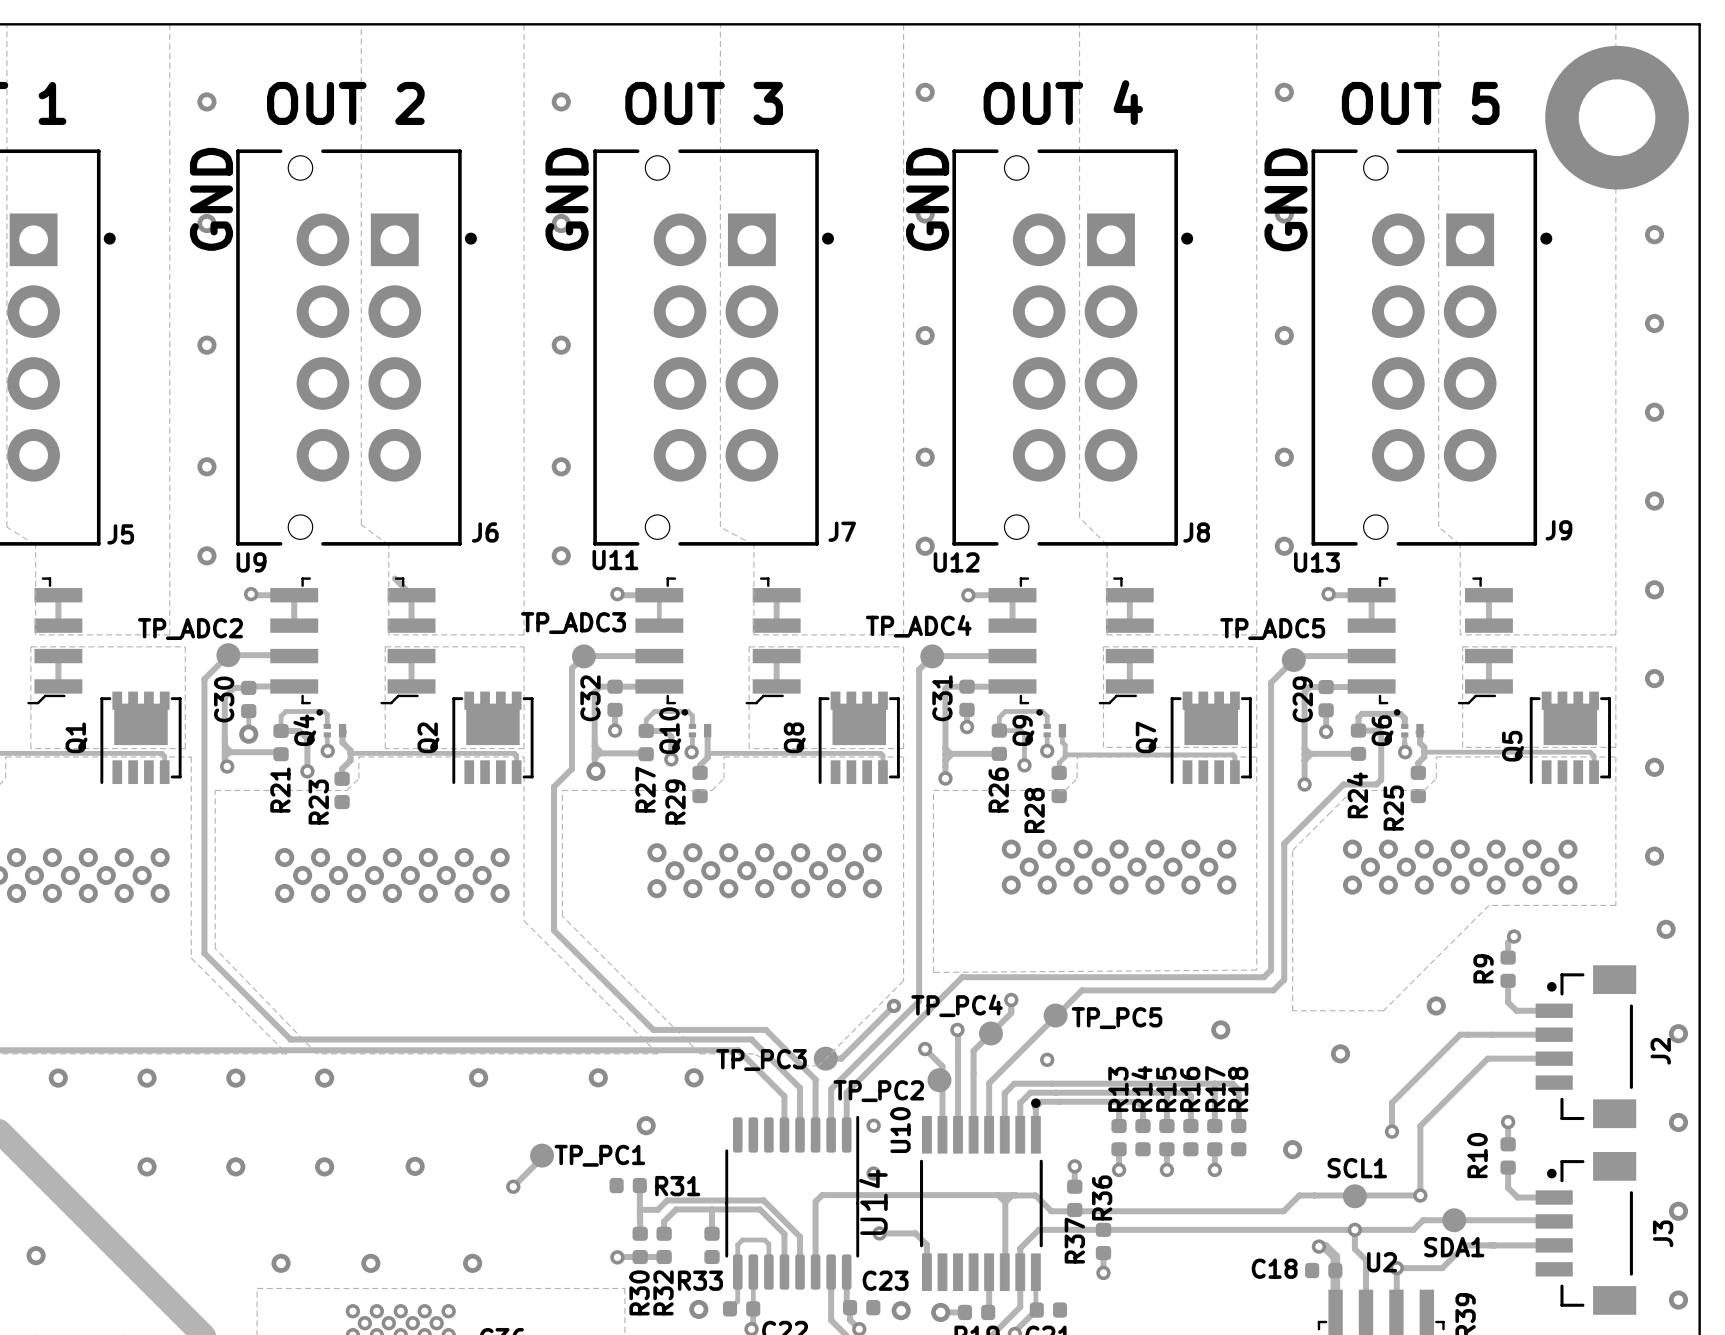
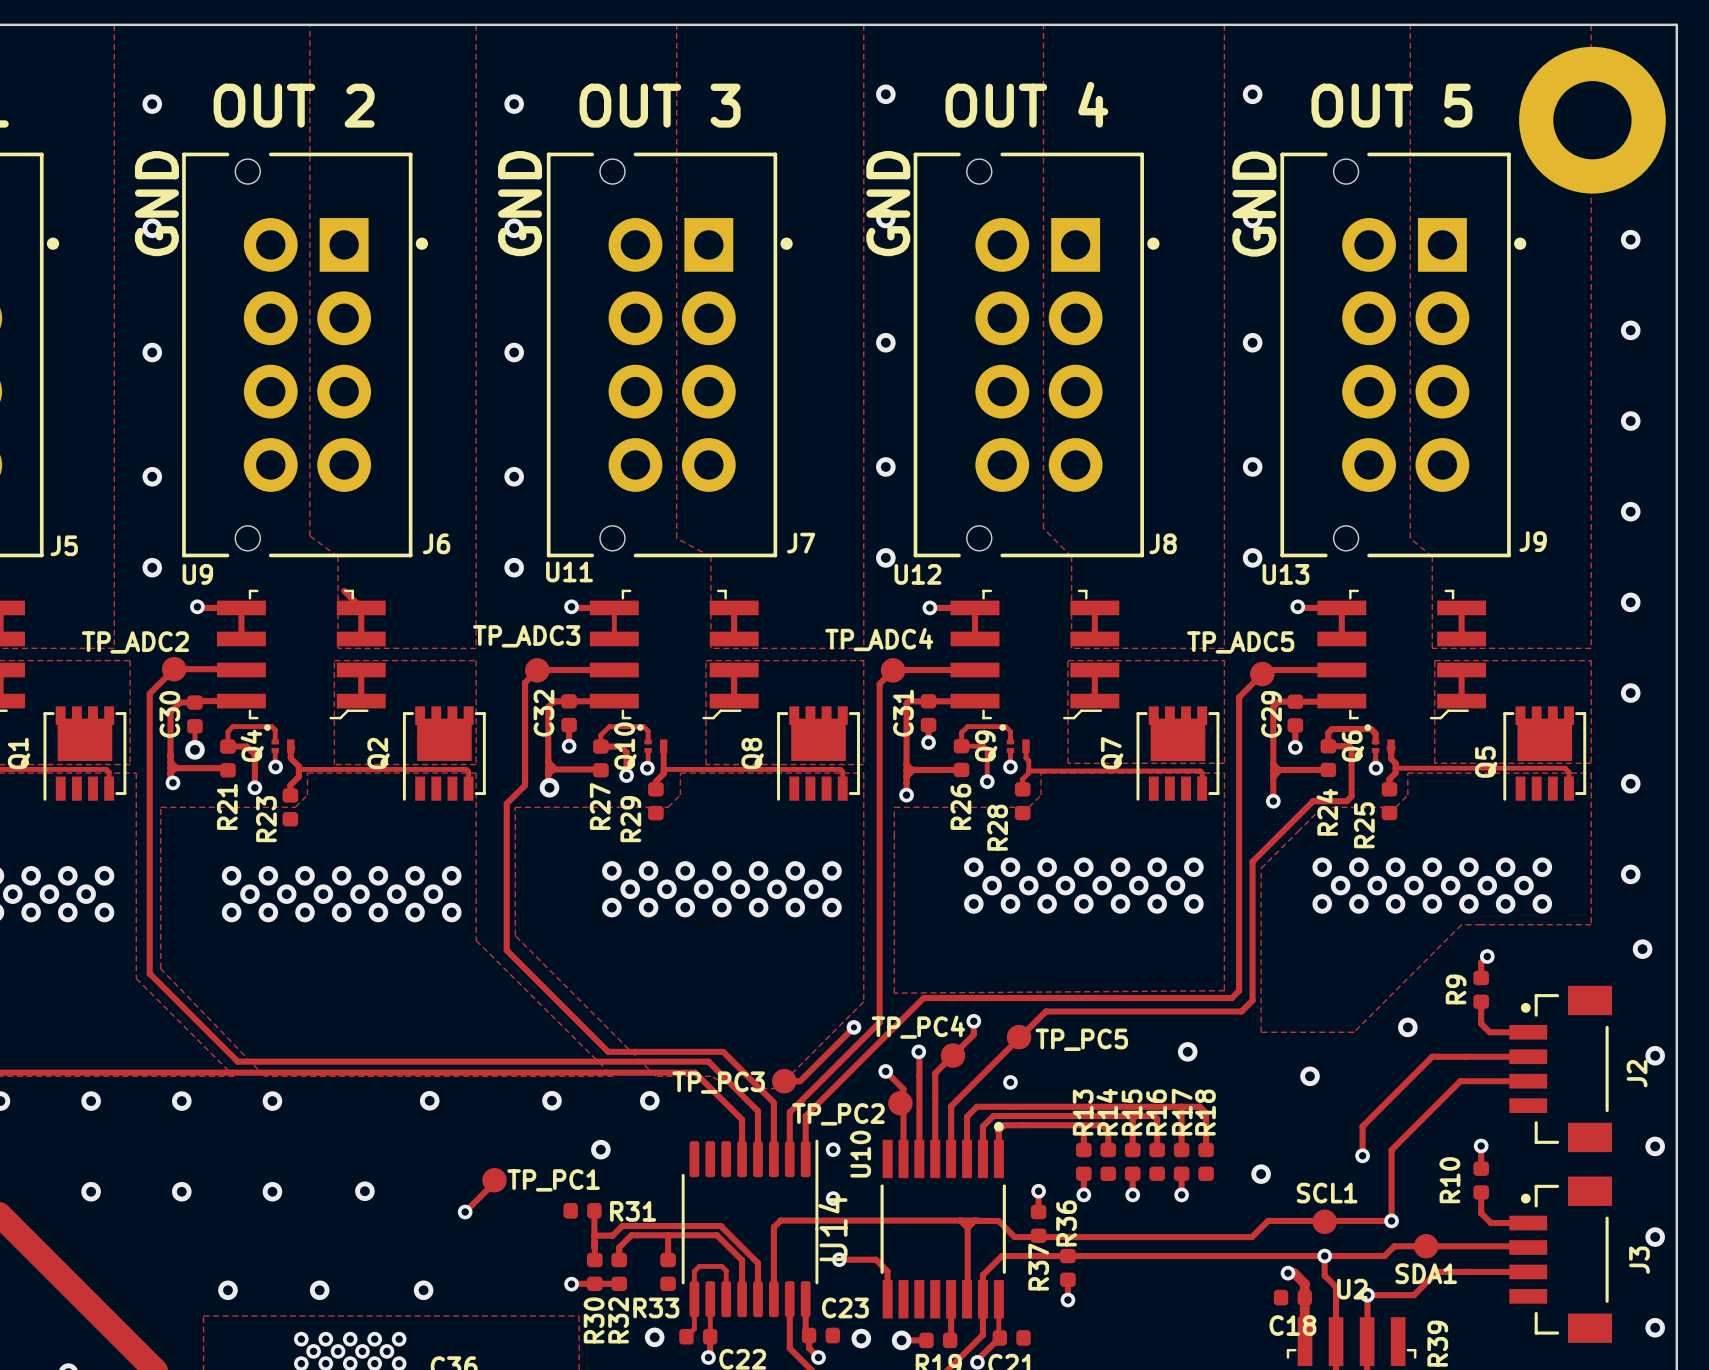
C18 name position: C18 (1274, 1268) -> C18 (1292, 1325)

